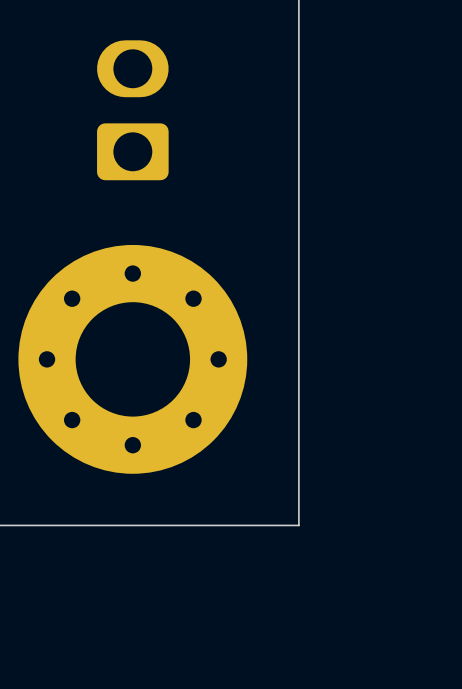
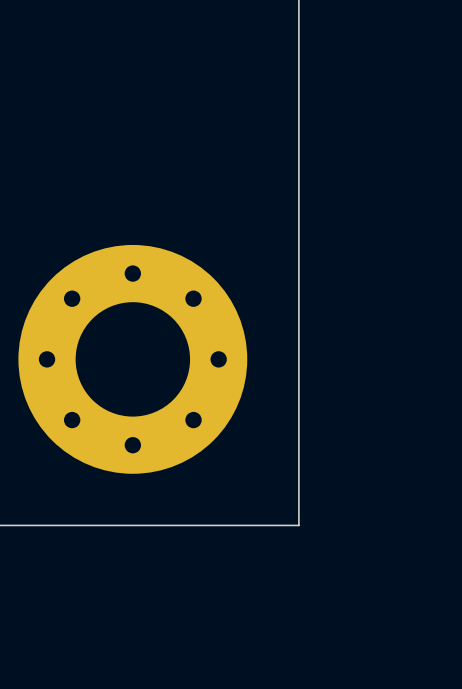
part: (132, 110) -> none

